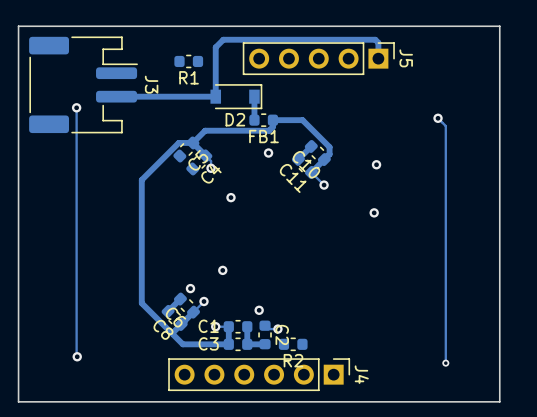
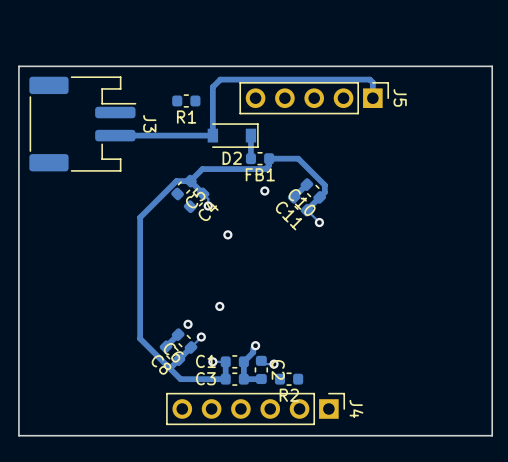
track: (76, 107) (77, 356) -> none
via: (76, 107) -> none
track: (438, 118) (445, 126) (445, 363) -> none
via: (438, 118) -> none
via: (376, 164) -> none
via: (374, 212) -> none
track: none -> (253, 347) (253, 352) (243, 361)
via: (77, 356) -> none
via: (445, 363) -> none

